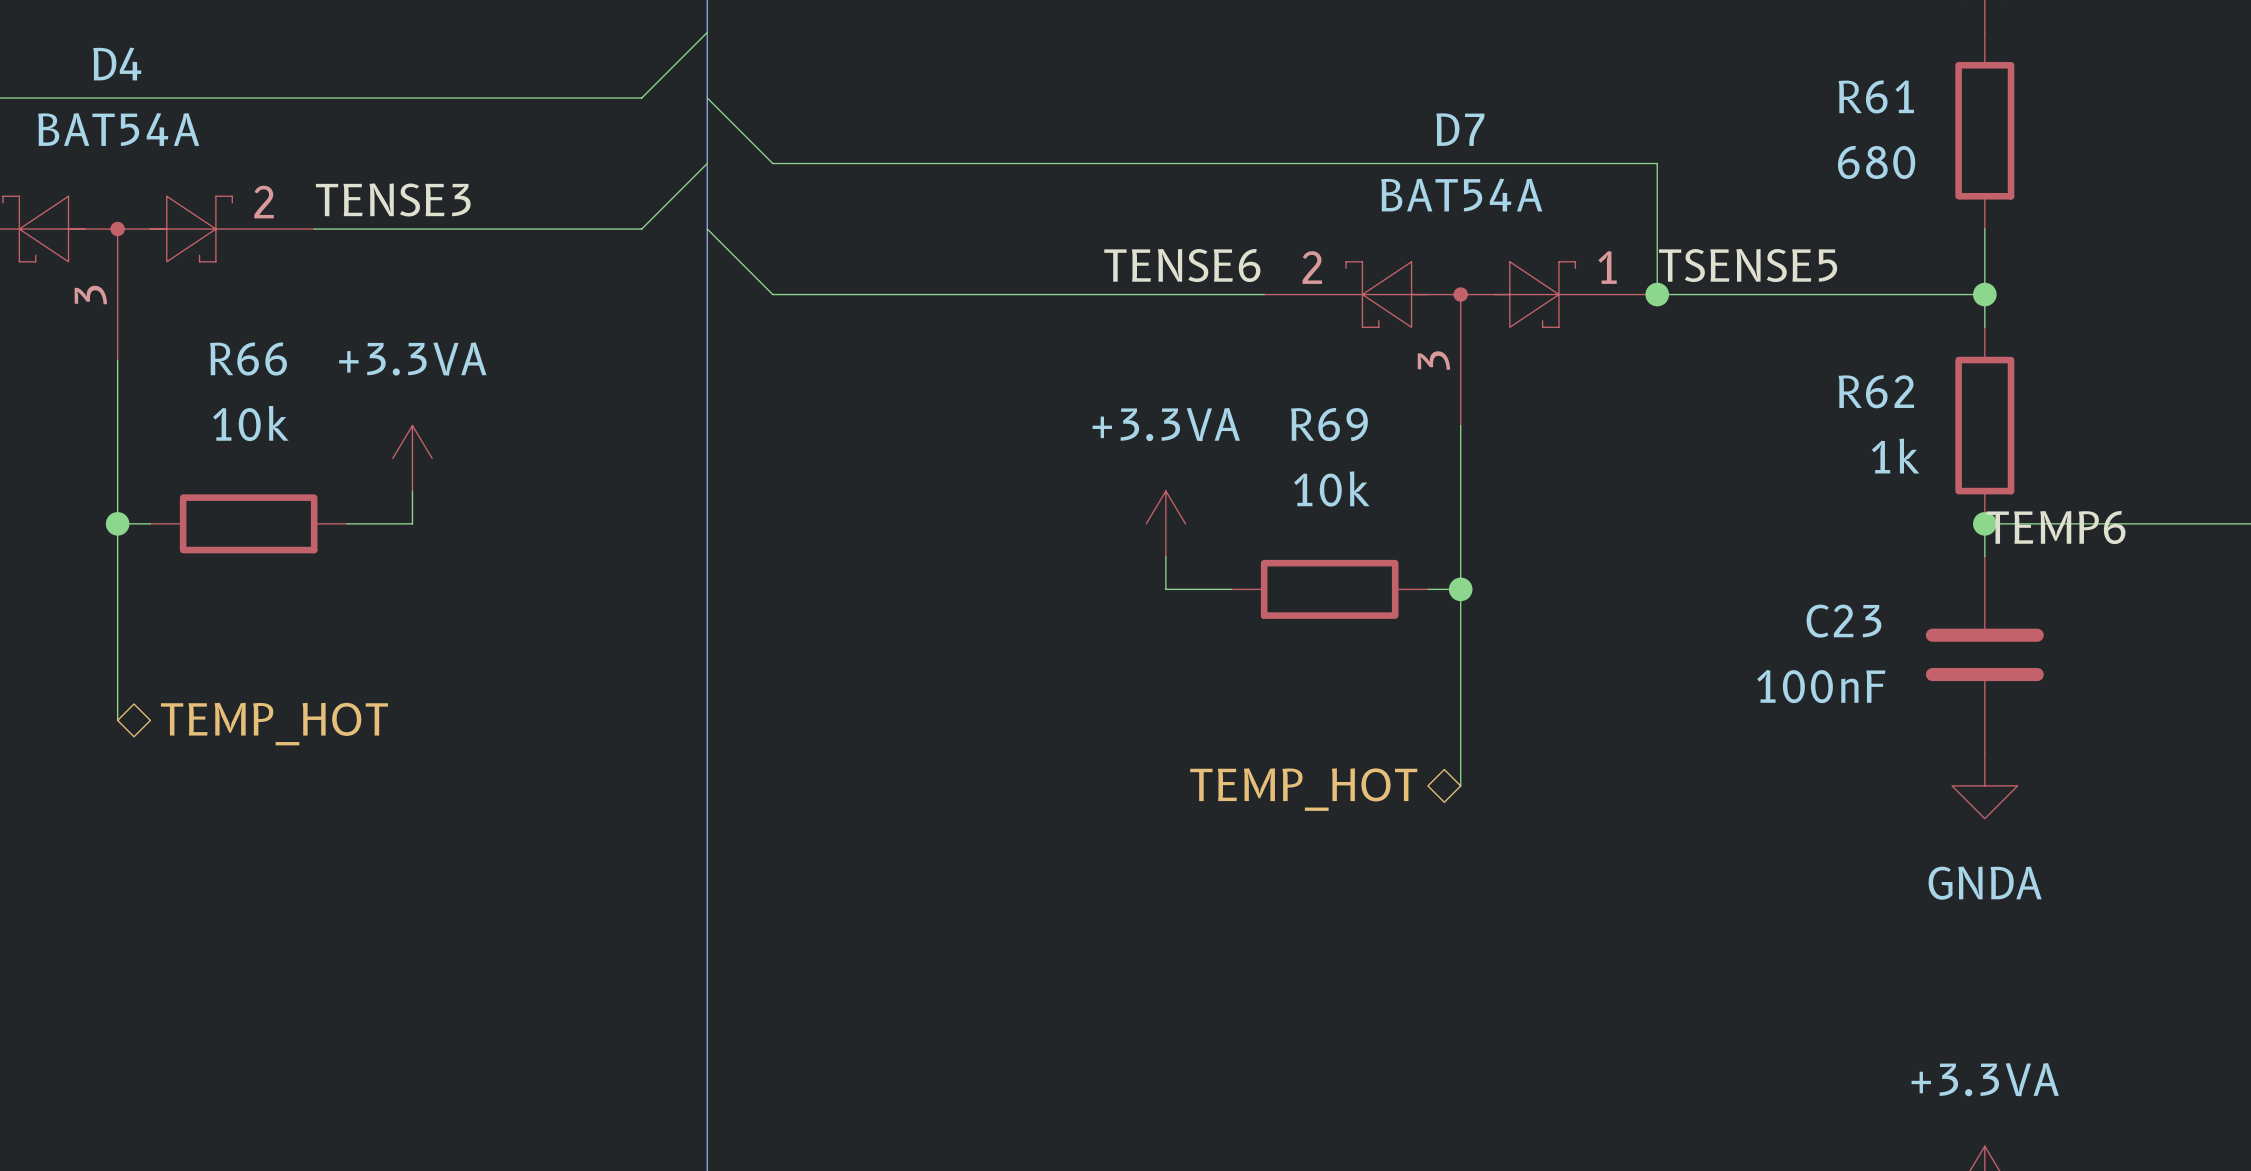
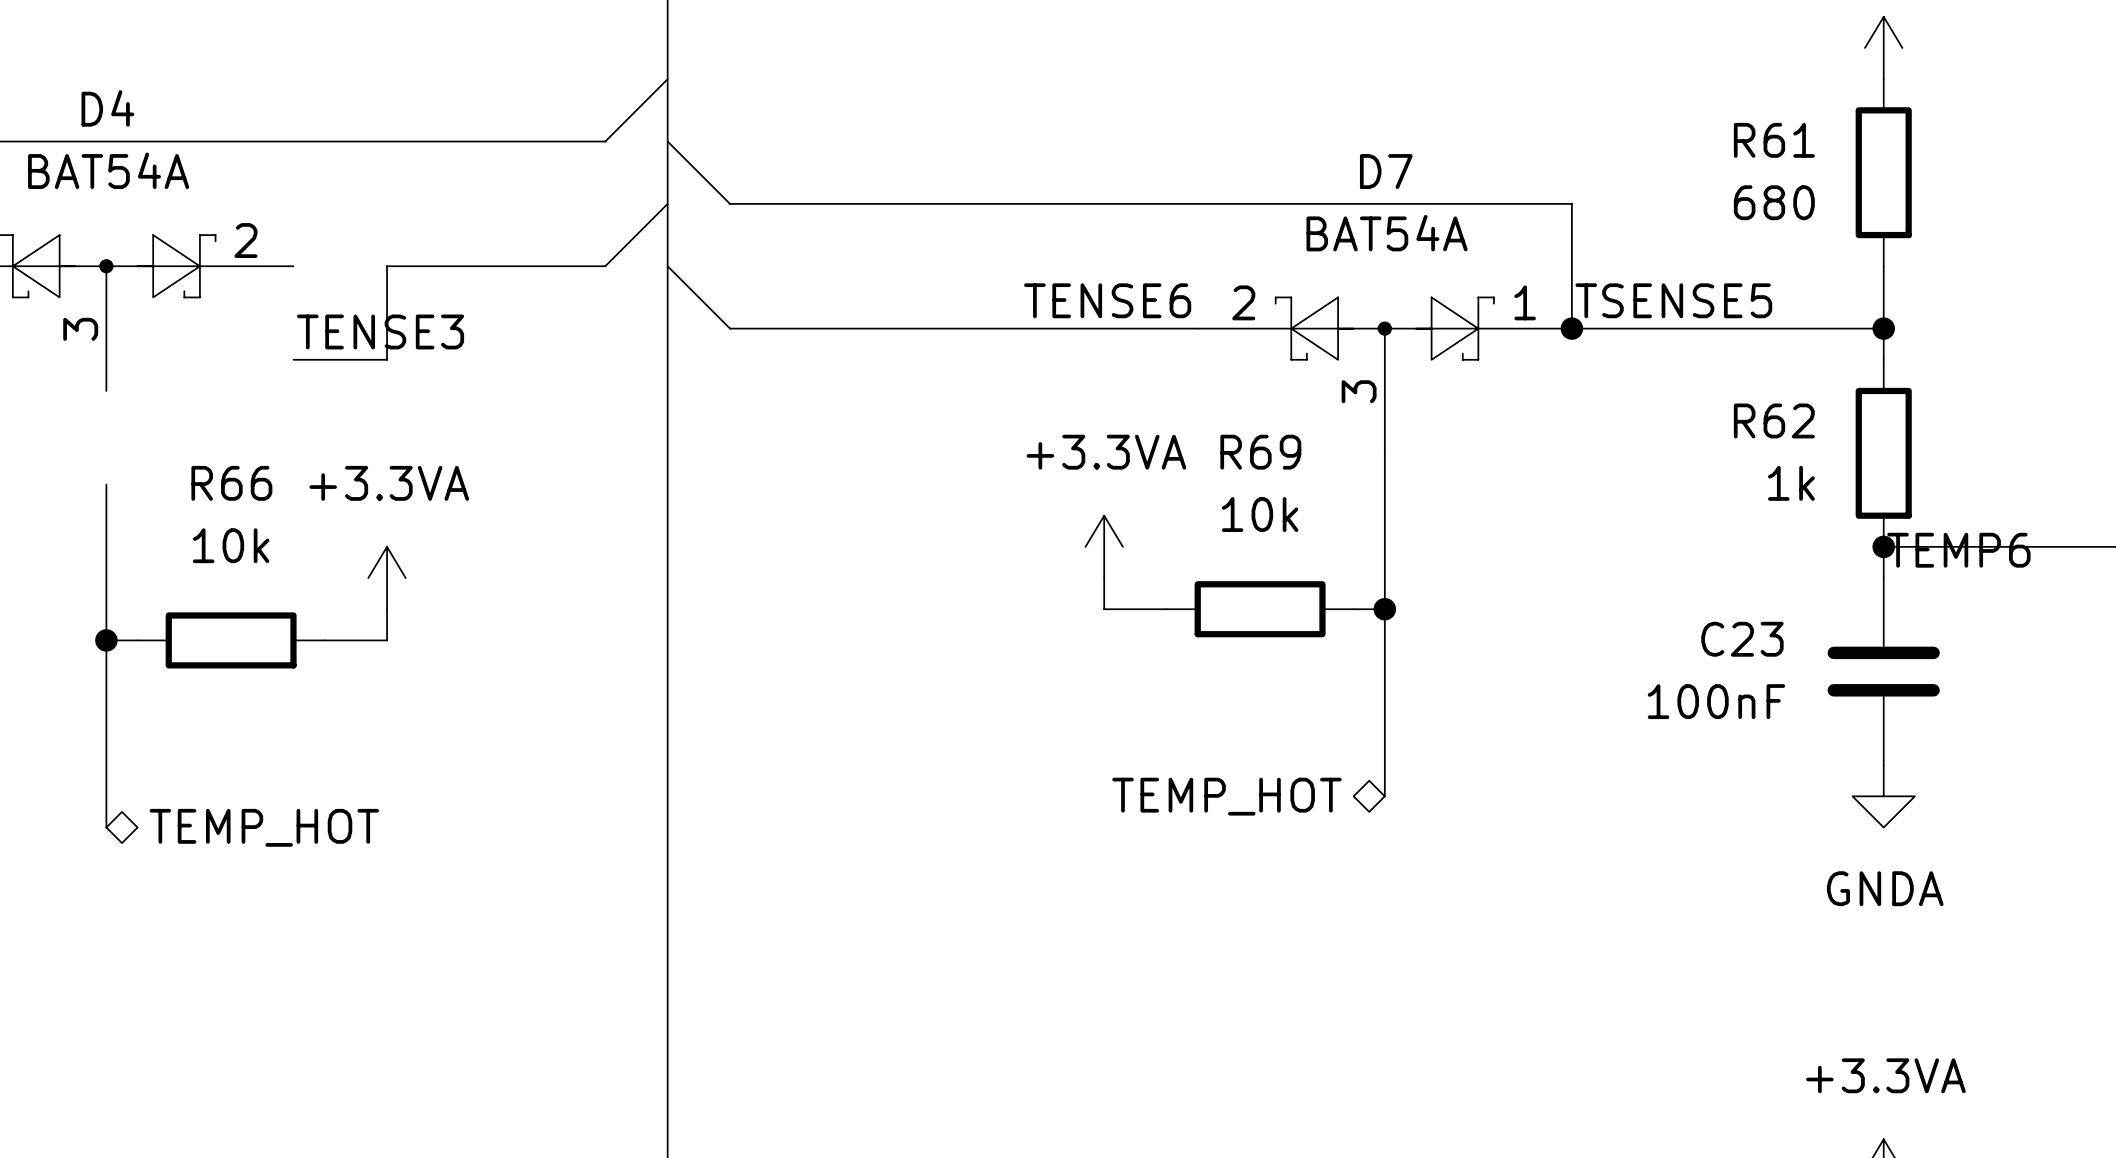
label position: TENSE3 (393, 199) -> TENSE3 (380, 331)
wire: (314, 229) (412, 229) -> (293, 359) (387, 359) (387, 266)
wire: (117, 360) (117, 458) -> (106, 733) (106, 827)
power symbol position: +3.3VA (412, 458) -> +3.3VA (387, 578)
wire: (412, 491) (412, 523) (346, 523) -> (387, 609) (387, 640) (324, 640)
wire: (117, 523) (150, 523) -> (106, 640) (137, 640)
junction position: (117, 523) -> (106, 640)
R66 position: (248, 523) -> (231, 640)
hierarchical label position: TEMP_HOT (274, 724) -> TEMP_HOT (264, 827)

